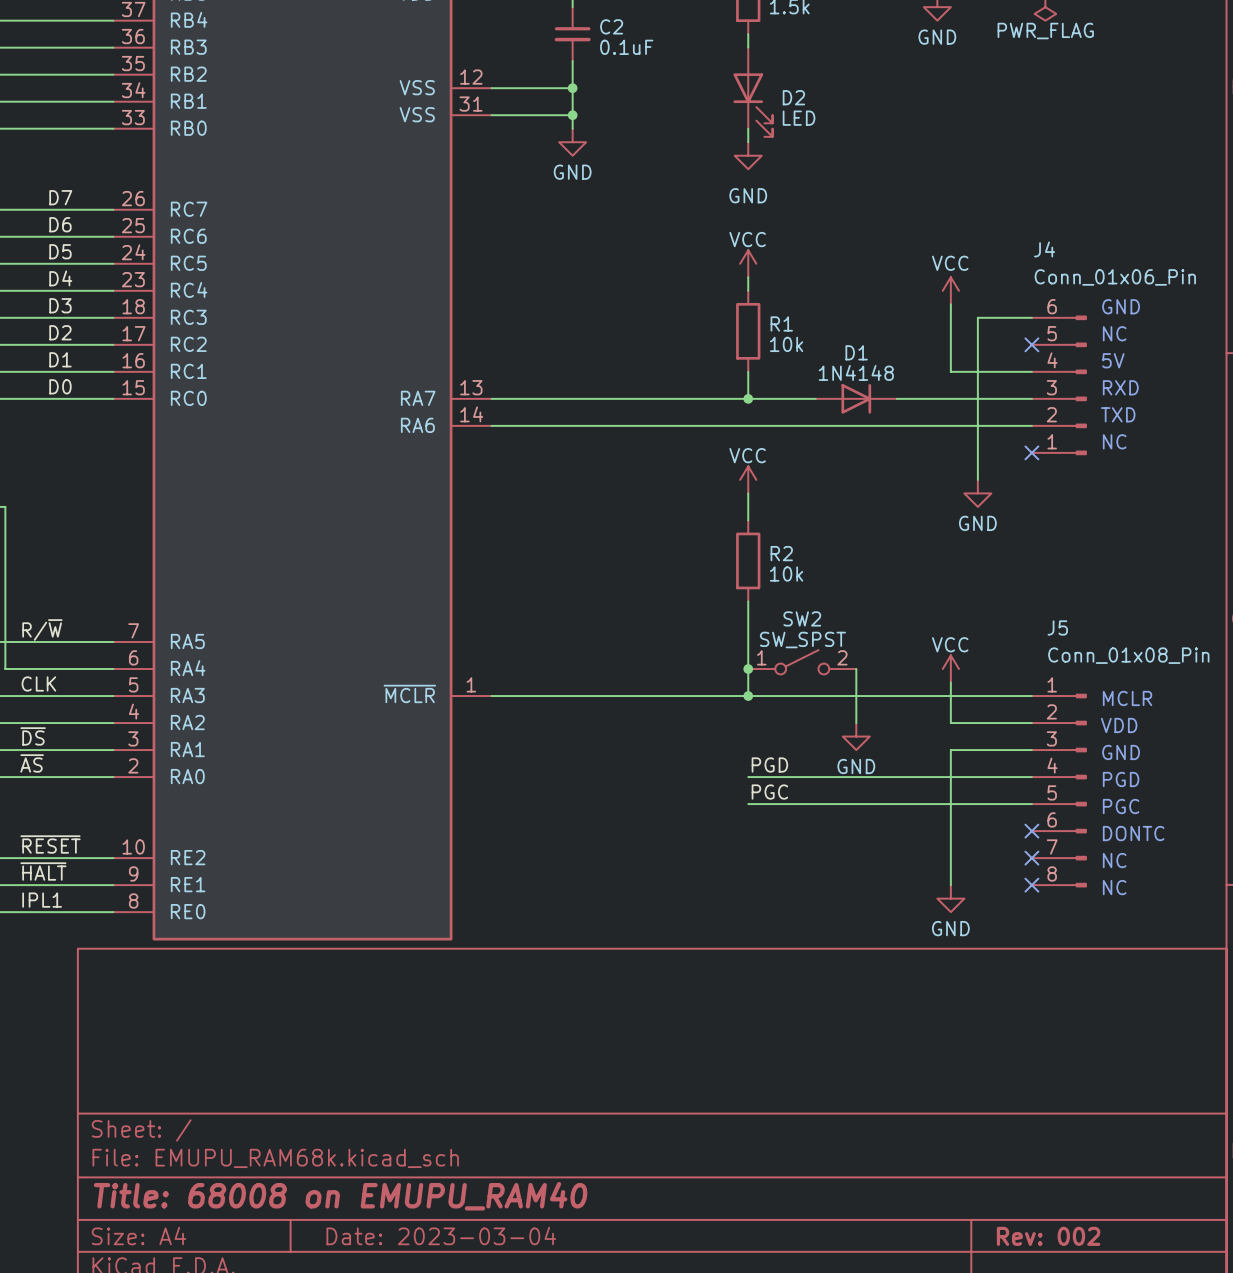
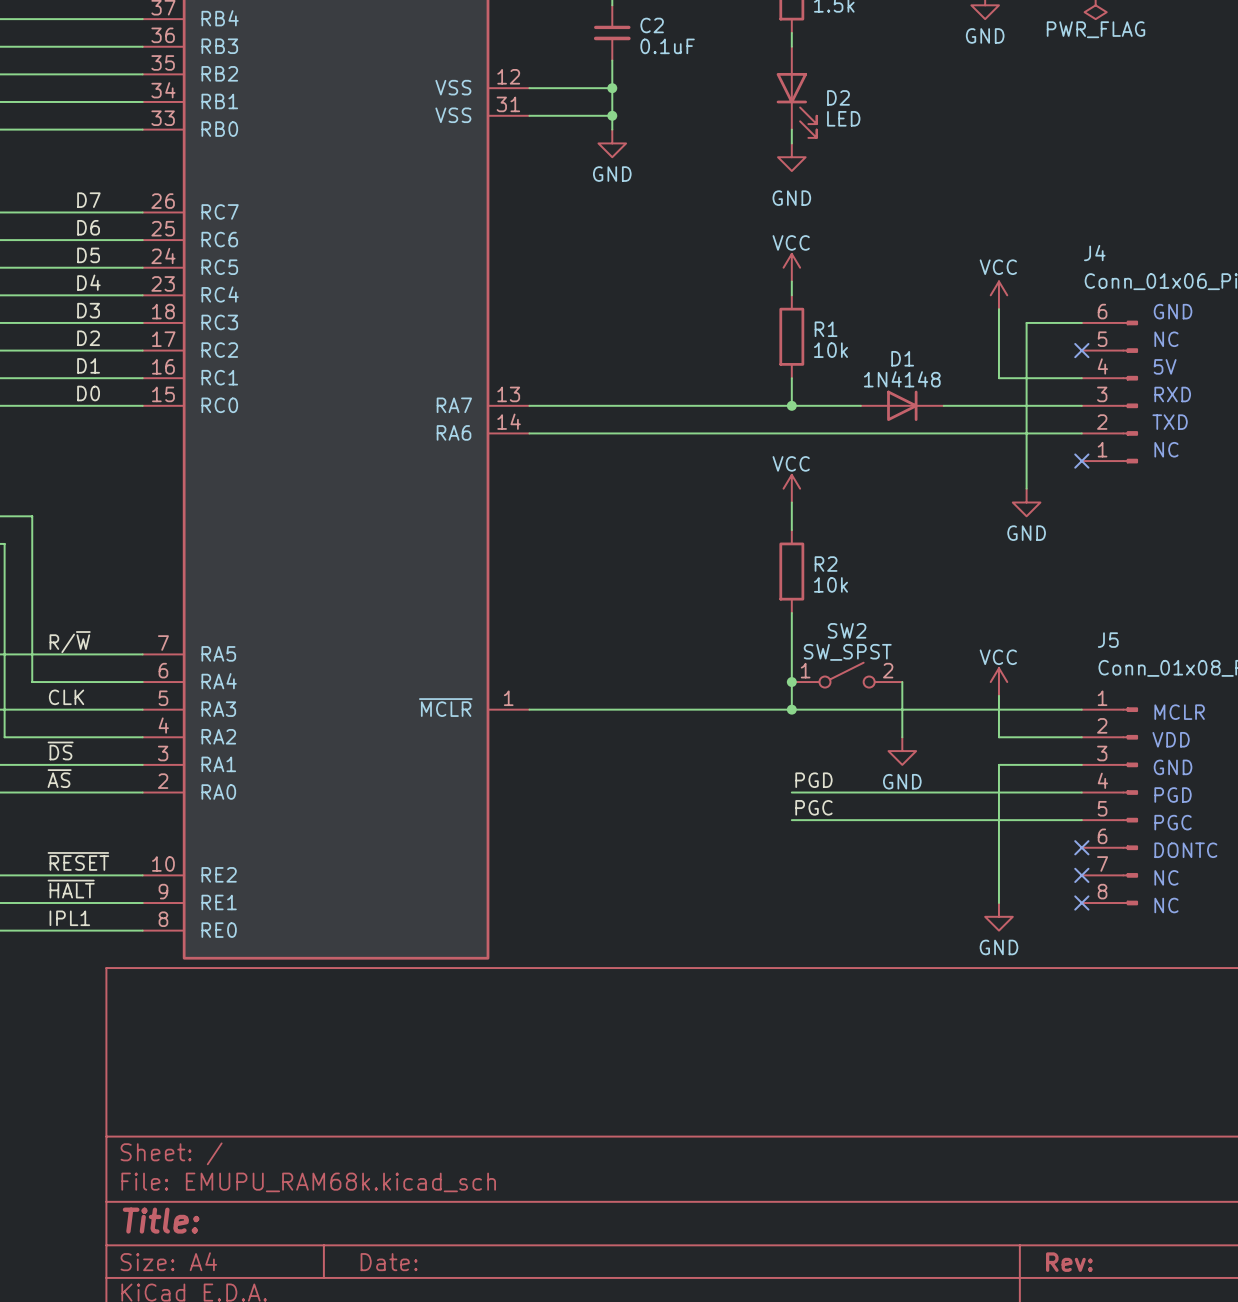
title block: Title: 68008 on EMUPU_RAM40 (340, 1196) -> Title: (161, 1220)
title block: Date: 2023-03-04 (441, 1235) -> Date: (389, 1262)
title block: Rev: 002 (1048, 1236) -> Rev: (1069, 1262)

